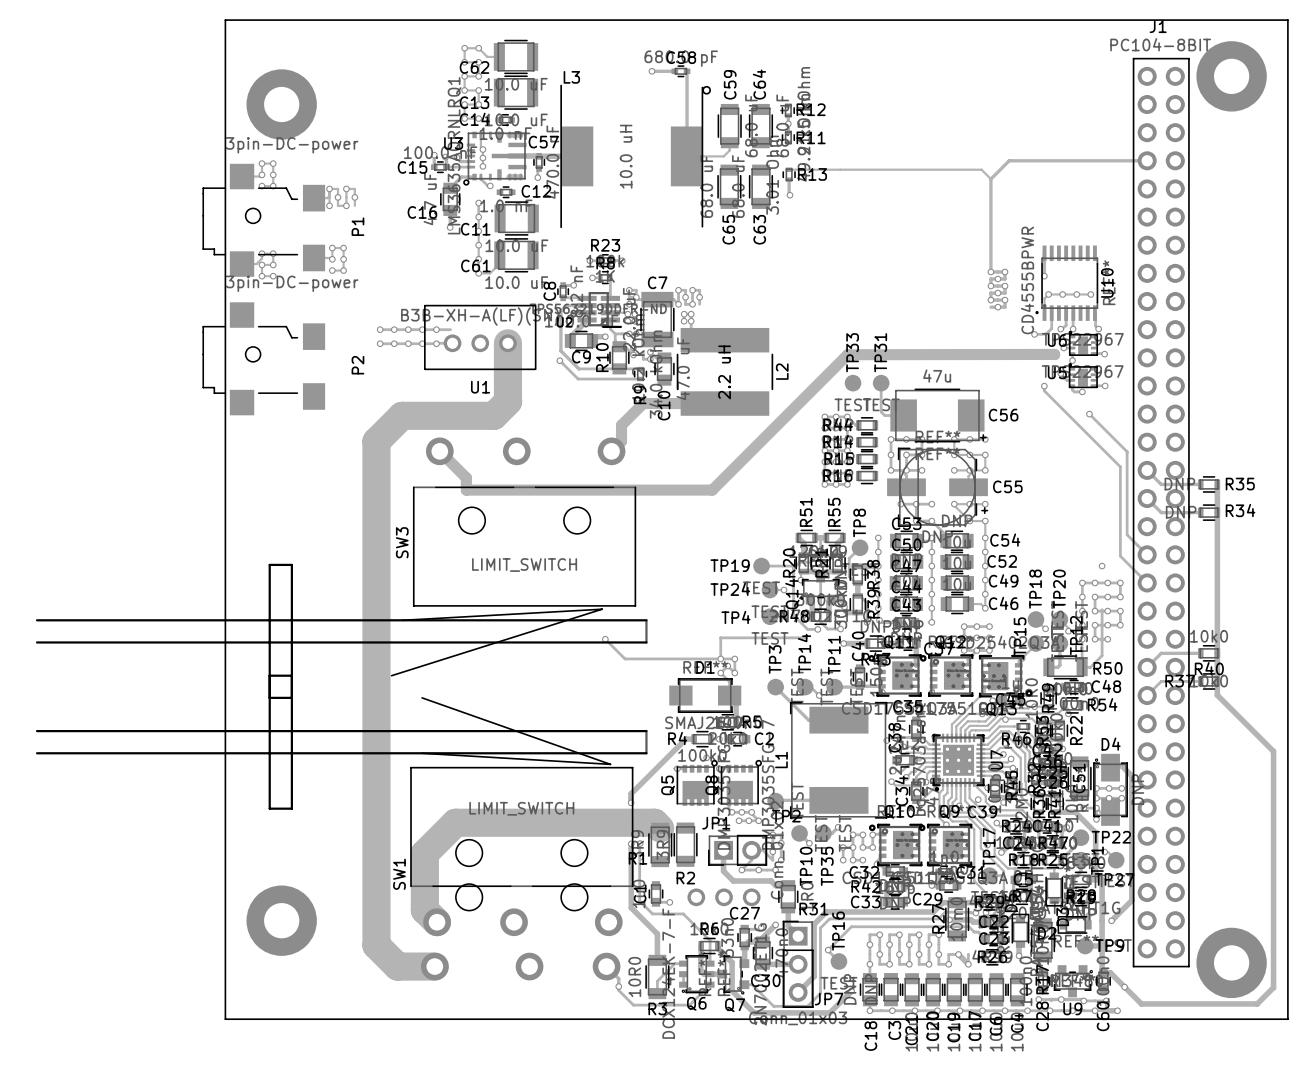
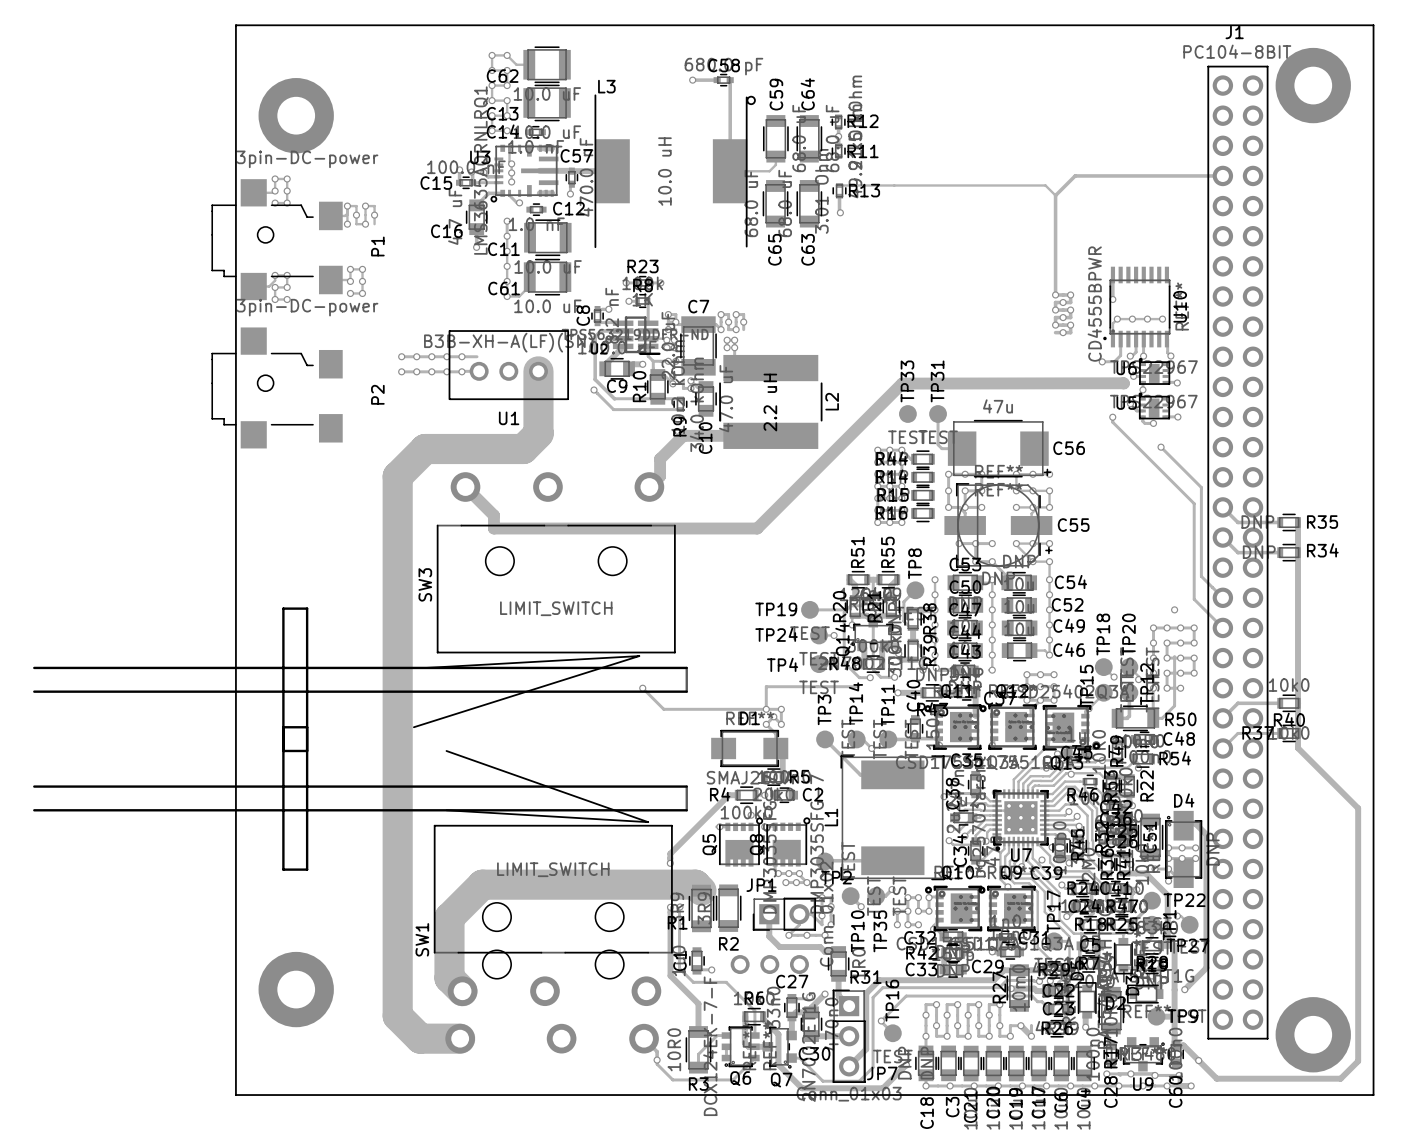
U7 name rotation: 0° (996, 759) -> 90° clockwise (1021, 855)
U7 name position: U7 (996, 759) -> U7 (1021, 855)

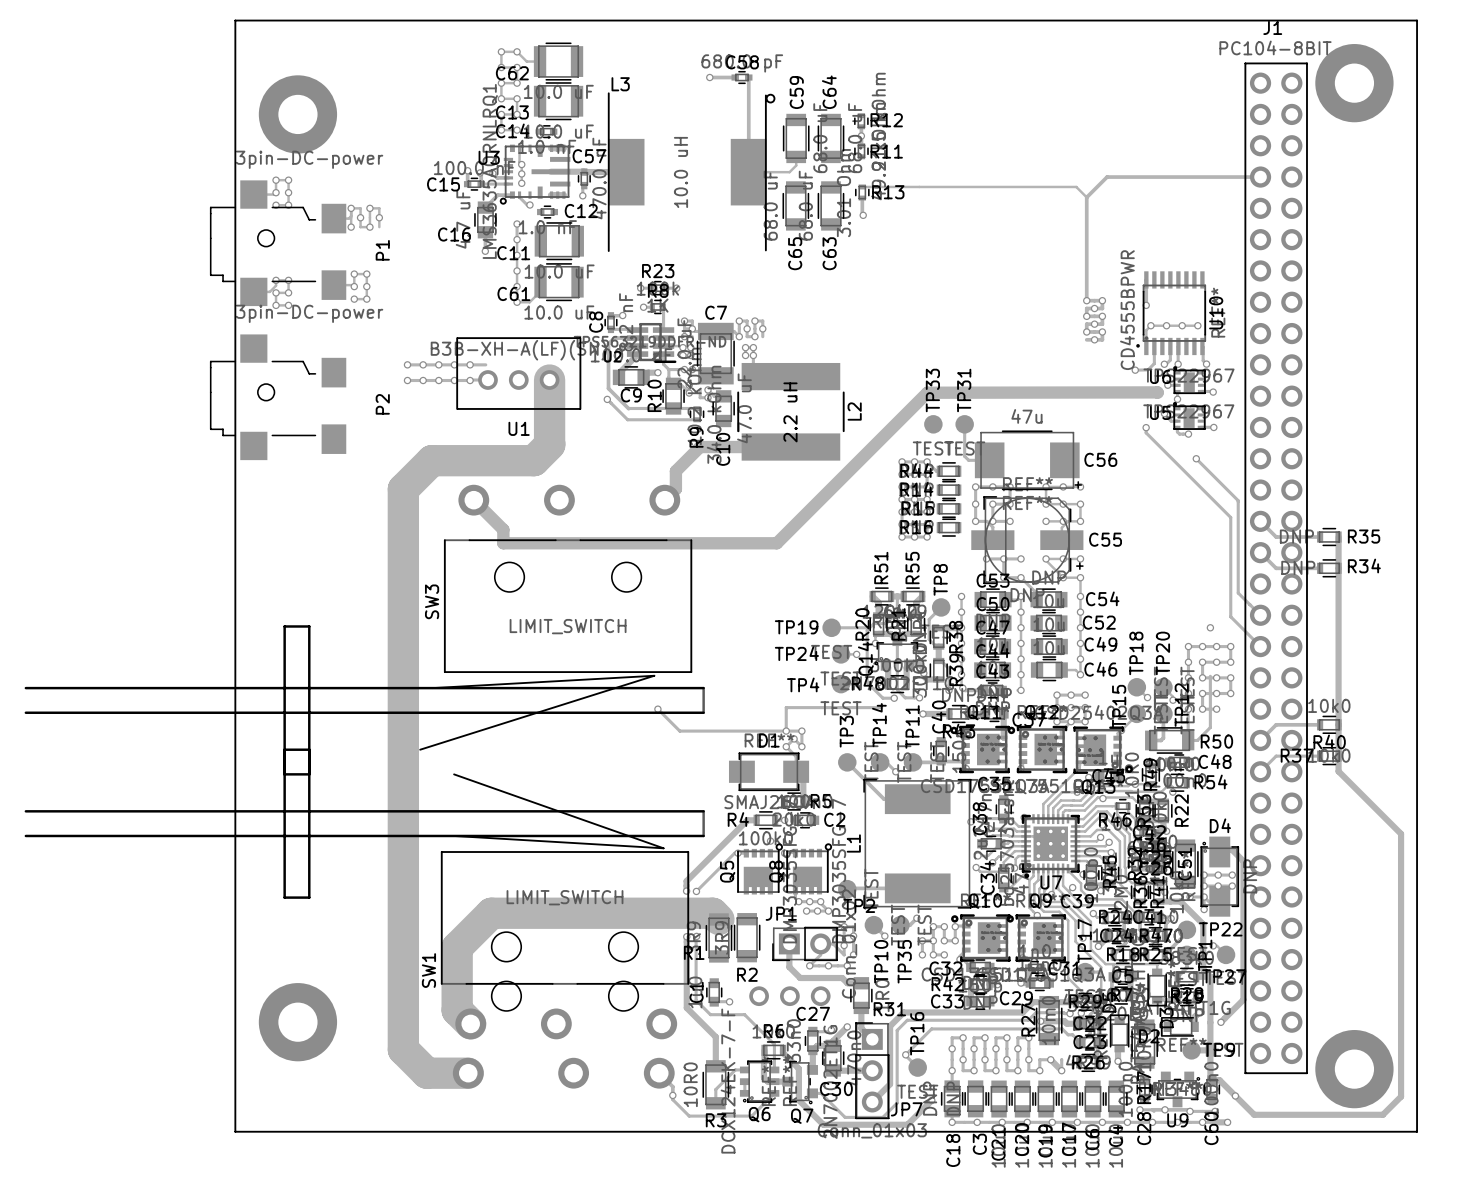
track: none -> (734, 853) (696, 891)
via: none -> (696, 891)

